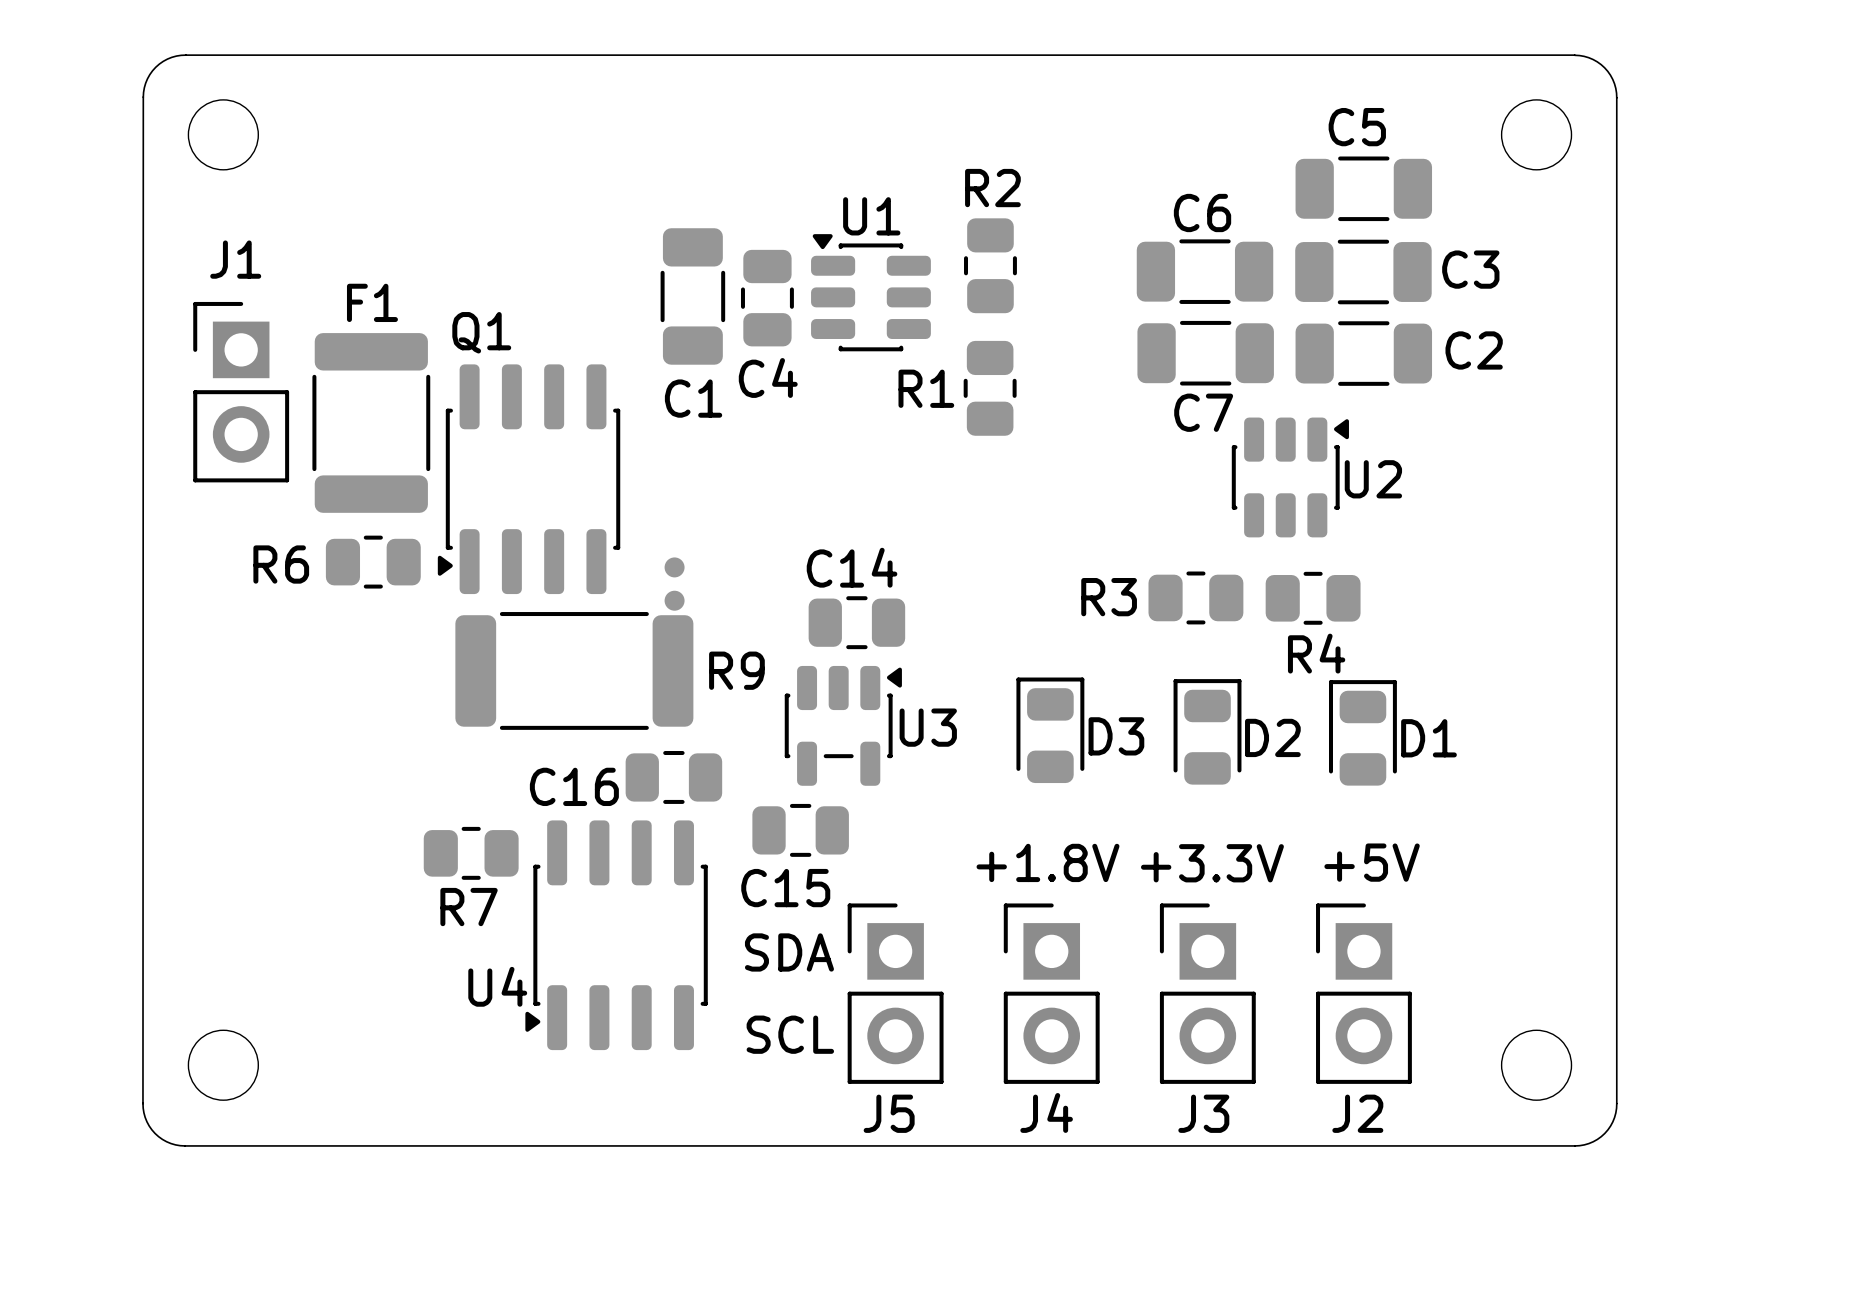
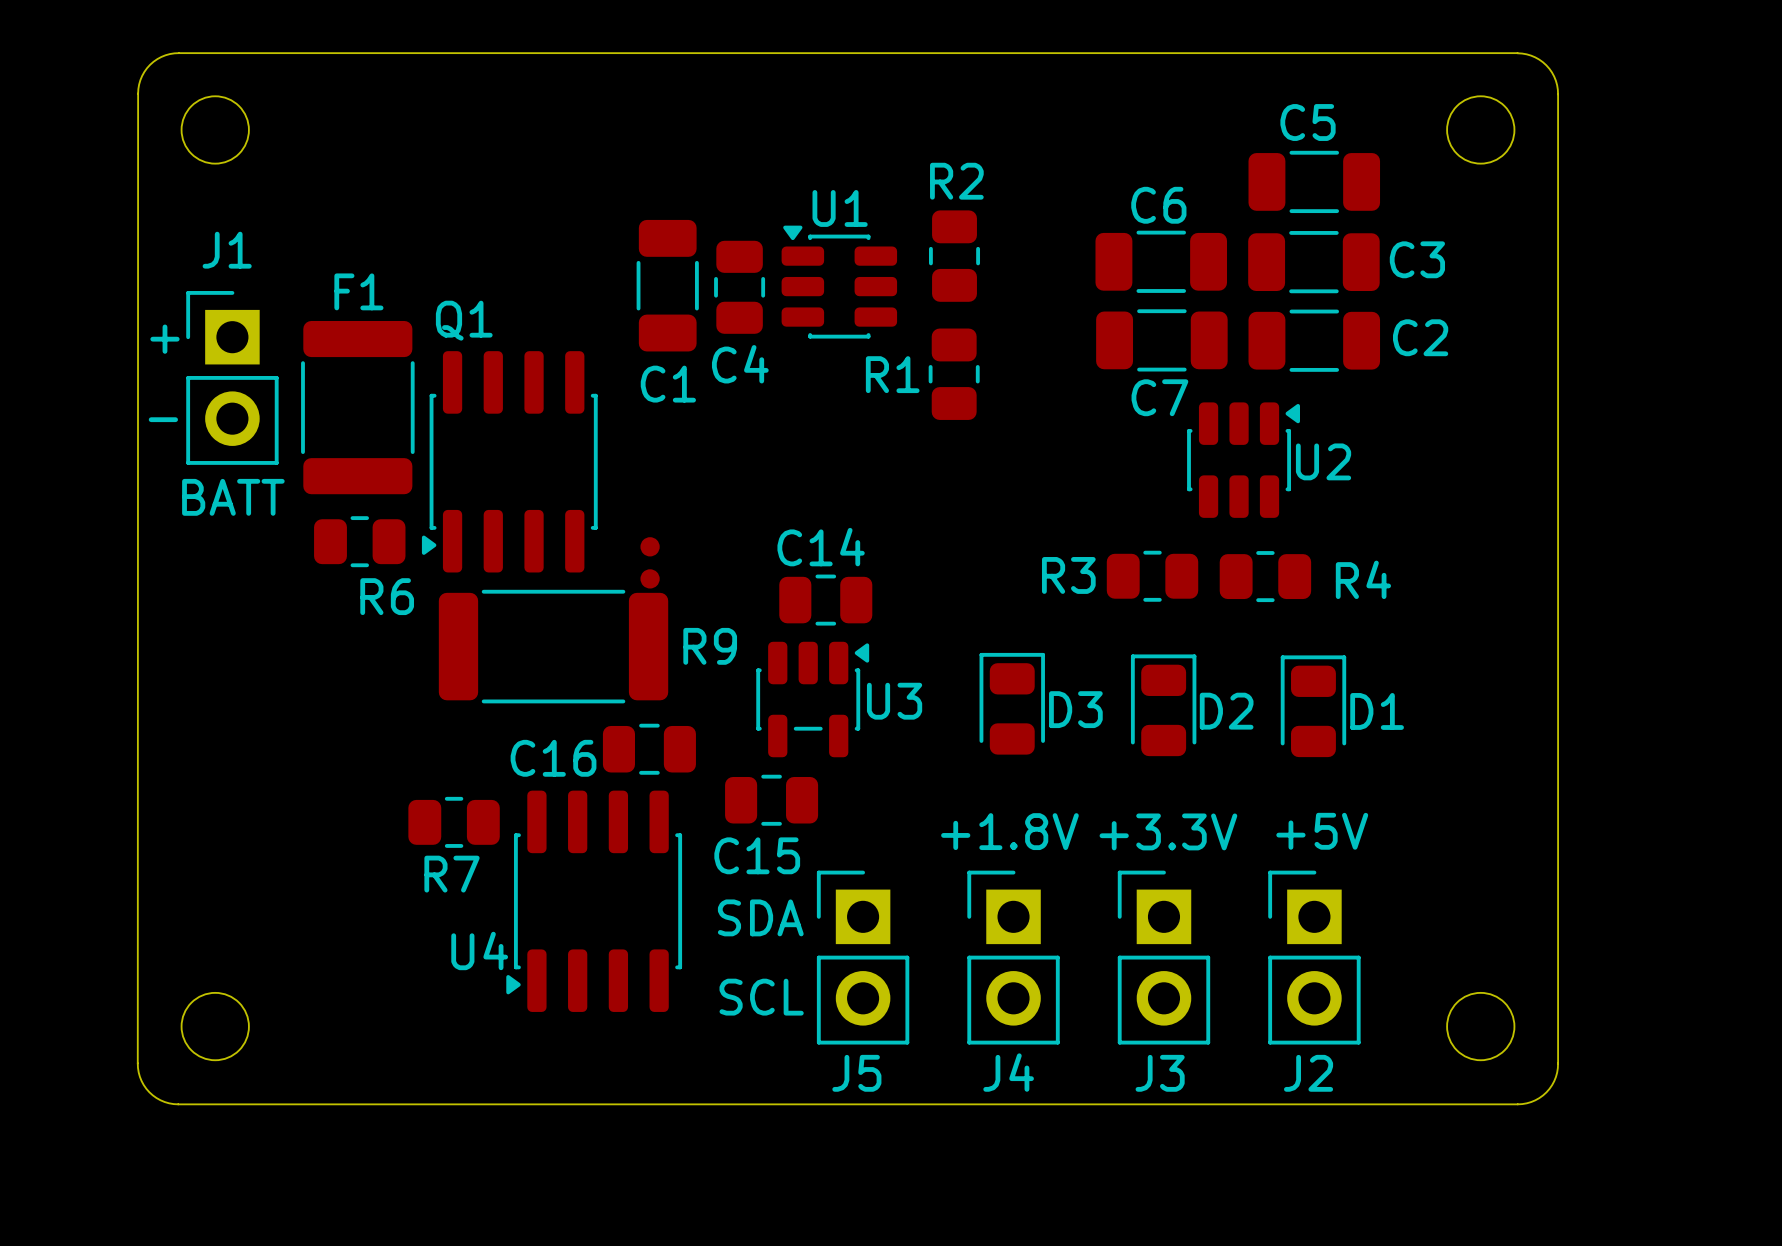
text: none -> + (164, 339)
text: none -> - (163, 419)
text: none -> BATT (233, 497)
R6 name position: R6 (281, 564) -> R6 (387, 596)
R4 name position: R4 (1316, 653) -> R4 (1363, 579)

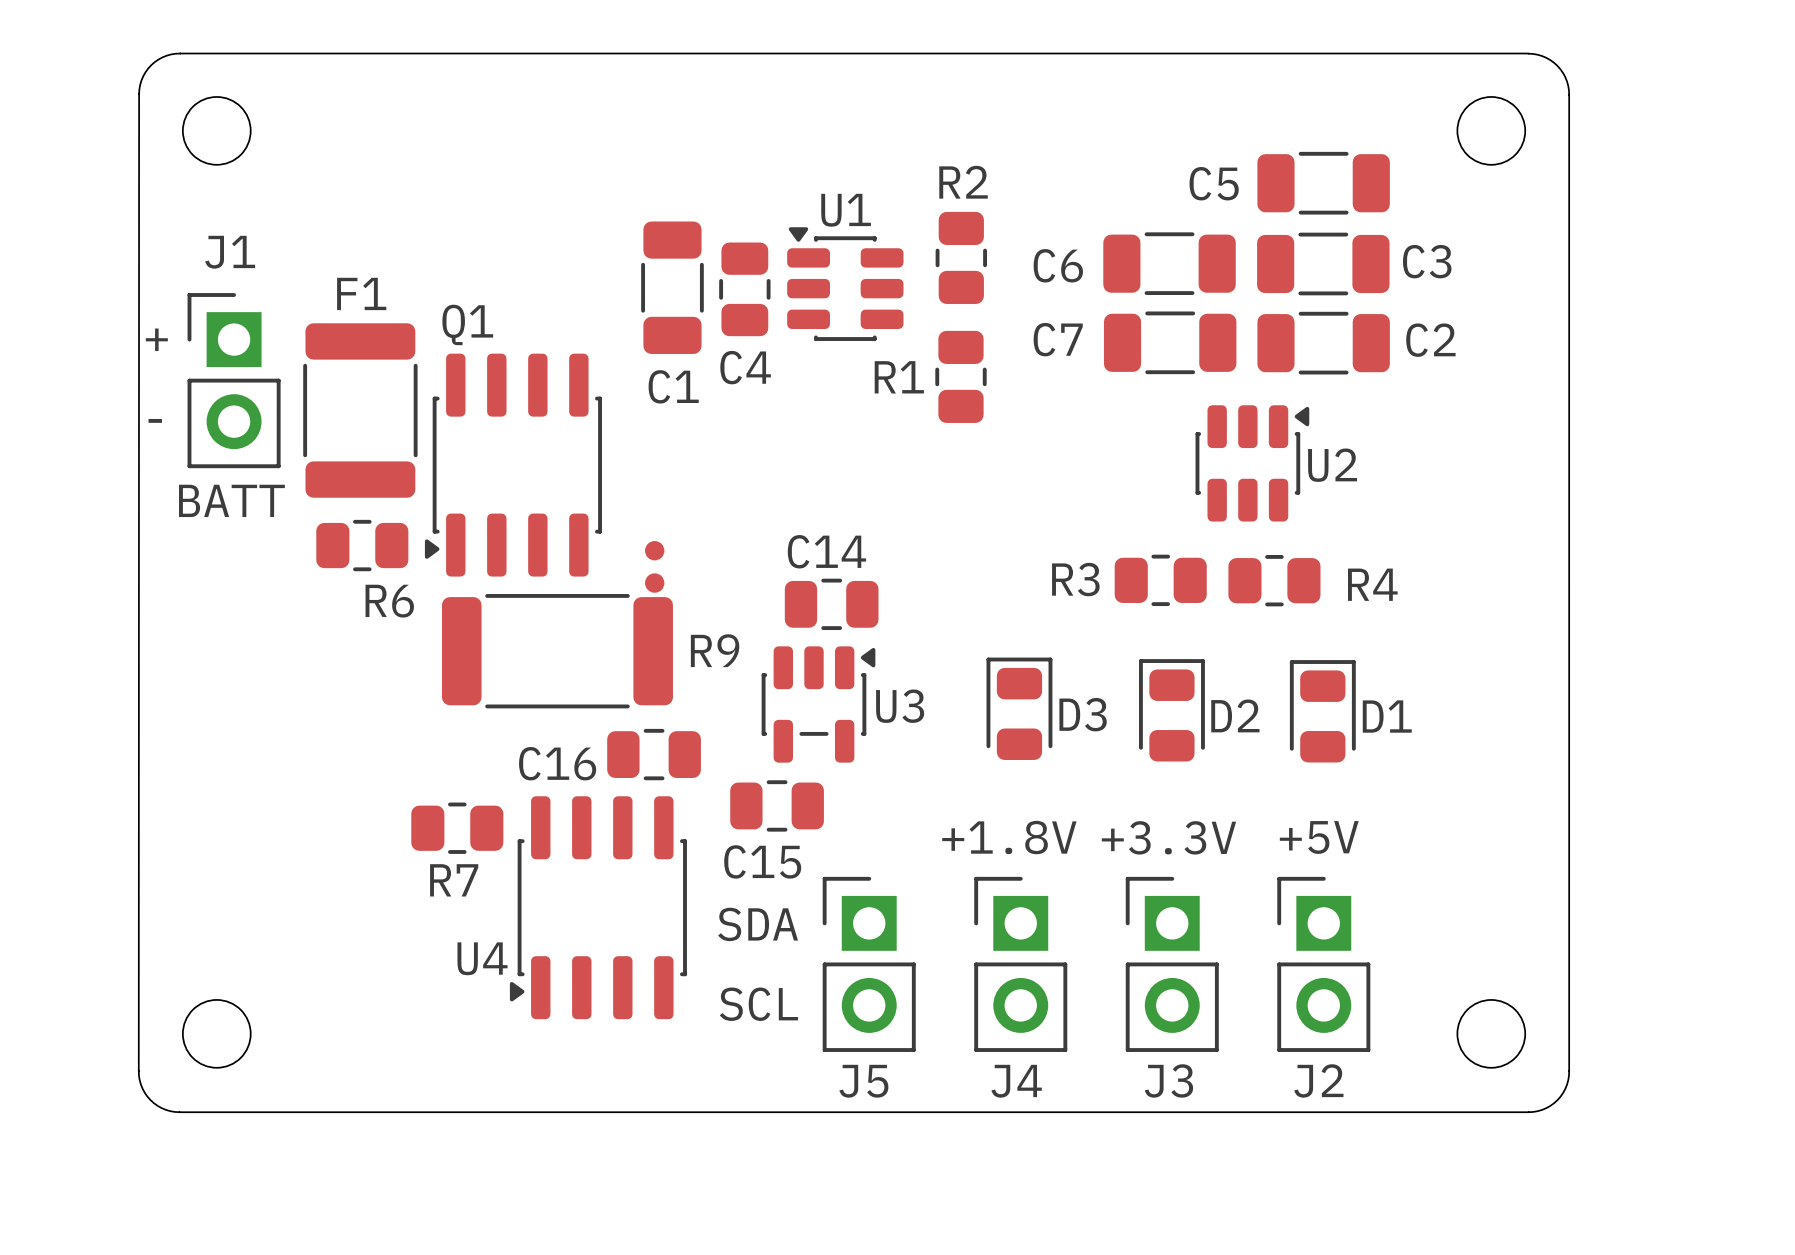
C5 name position: C5 (1308, 122) -> C5 (1214, 183)
C6 name position: C6 (1158, 205) -> C6 (1058, 265)
C7 name position: C7 (1159, 397) -> C7 (1058, 339)

